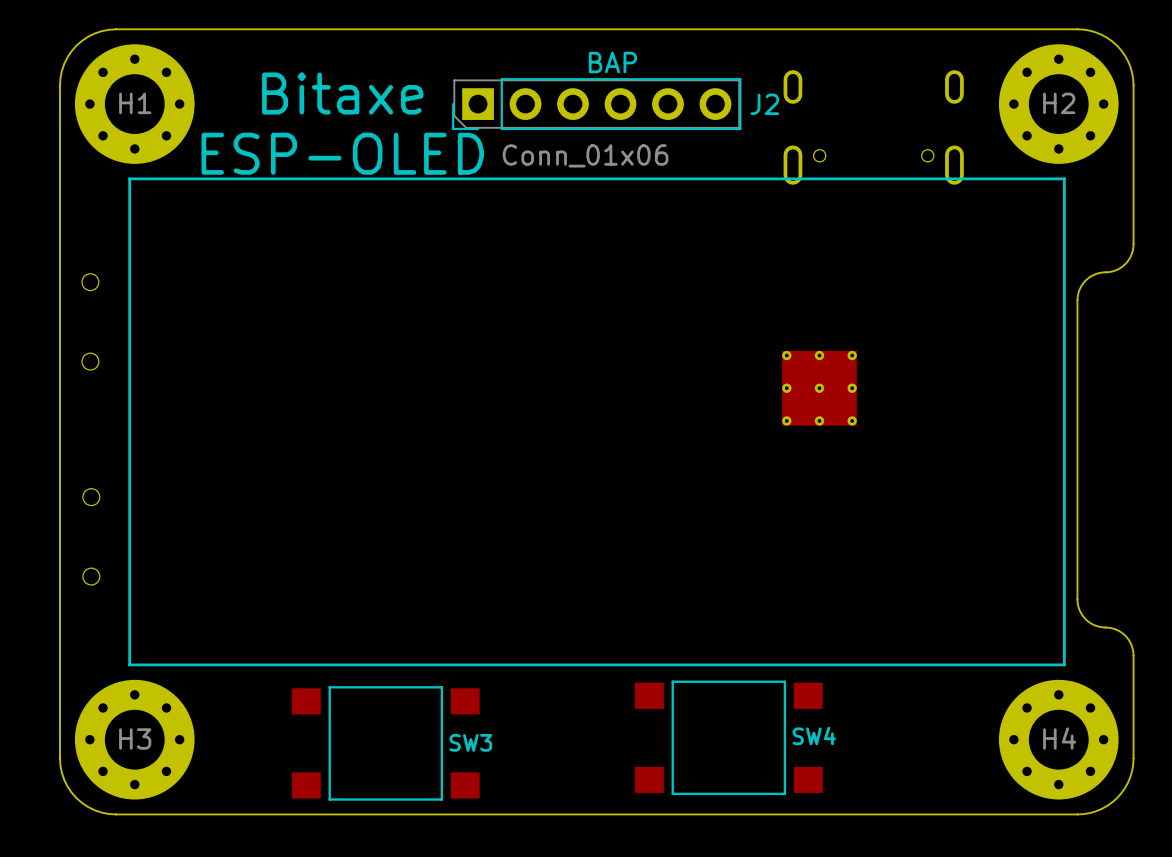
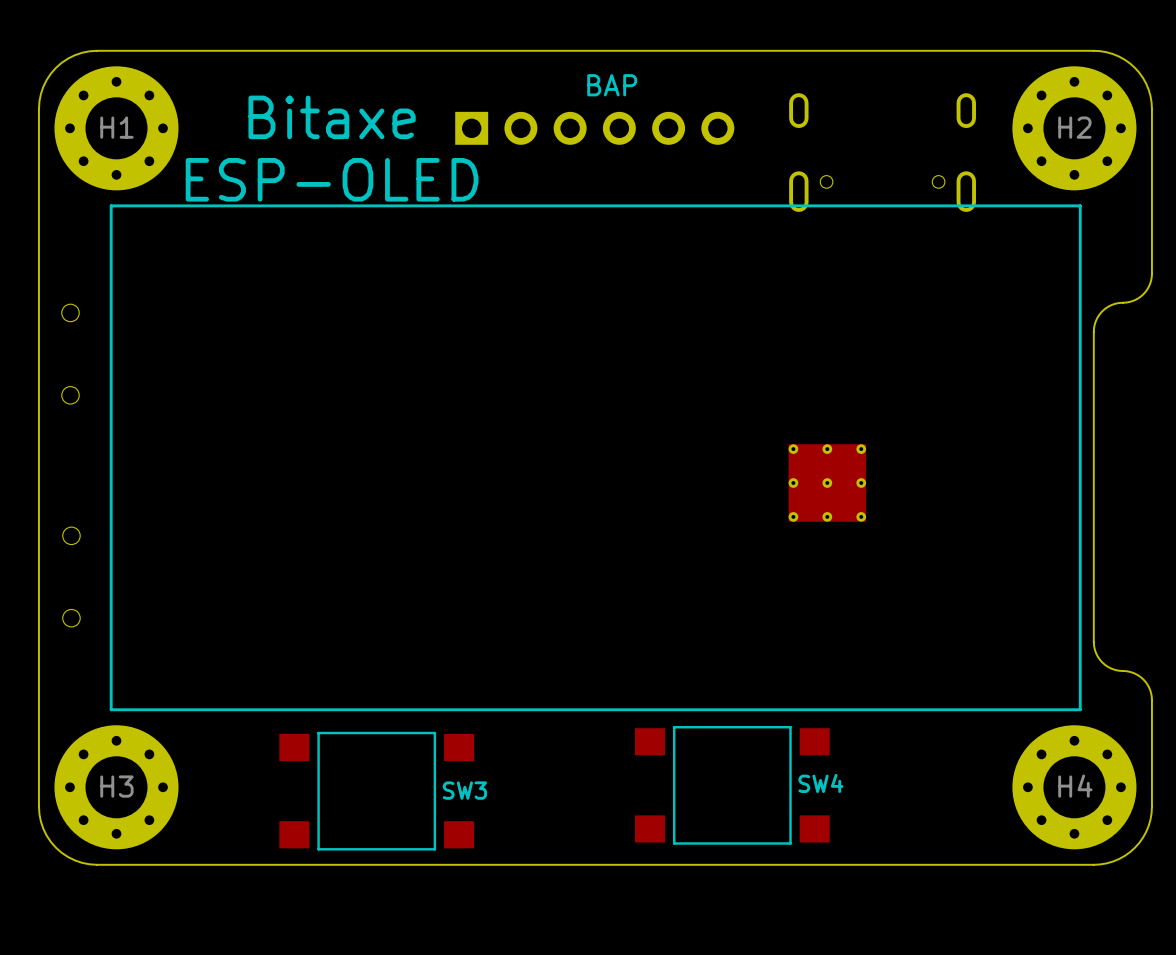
J2 side: top (596, 104) -> bottom (594, 128)
part position: (819, 388) -> (827, 483)

